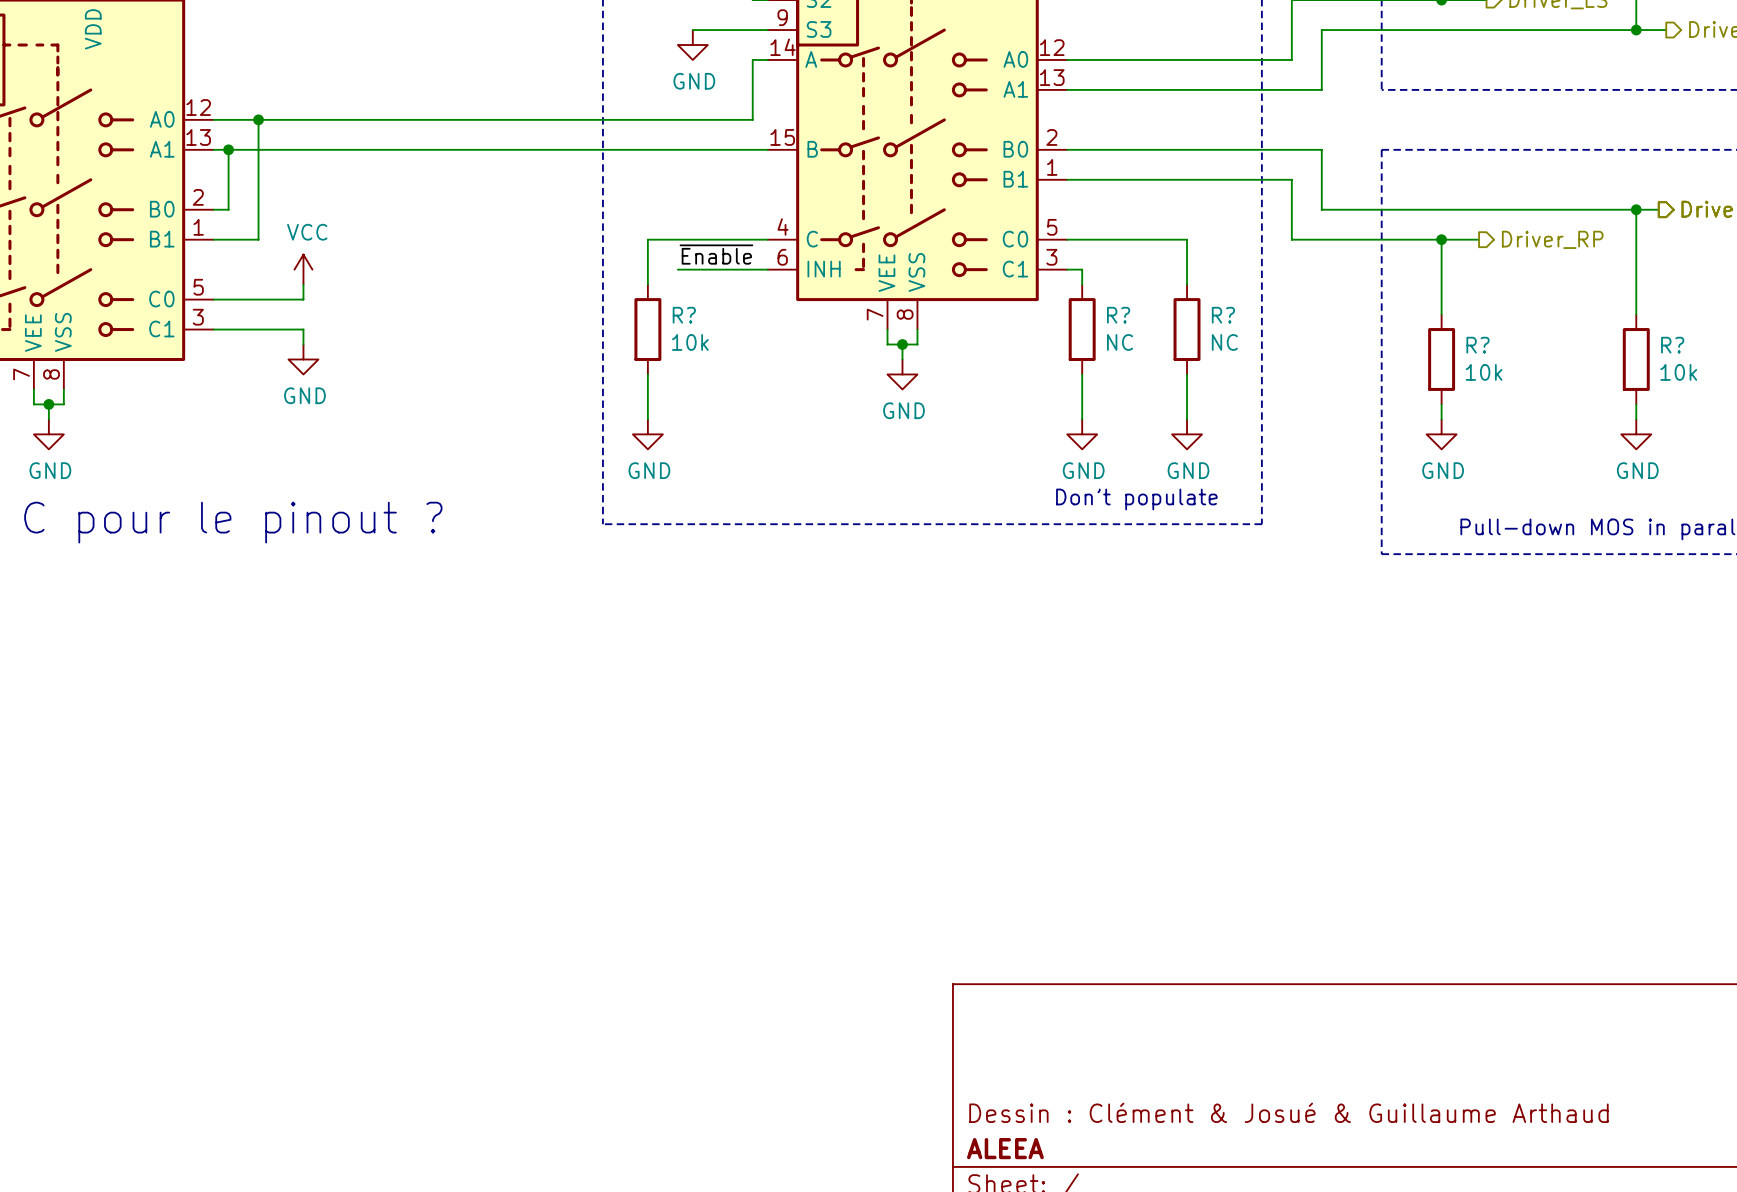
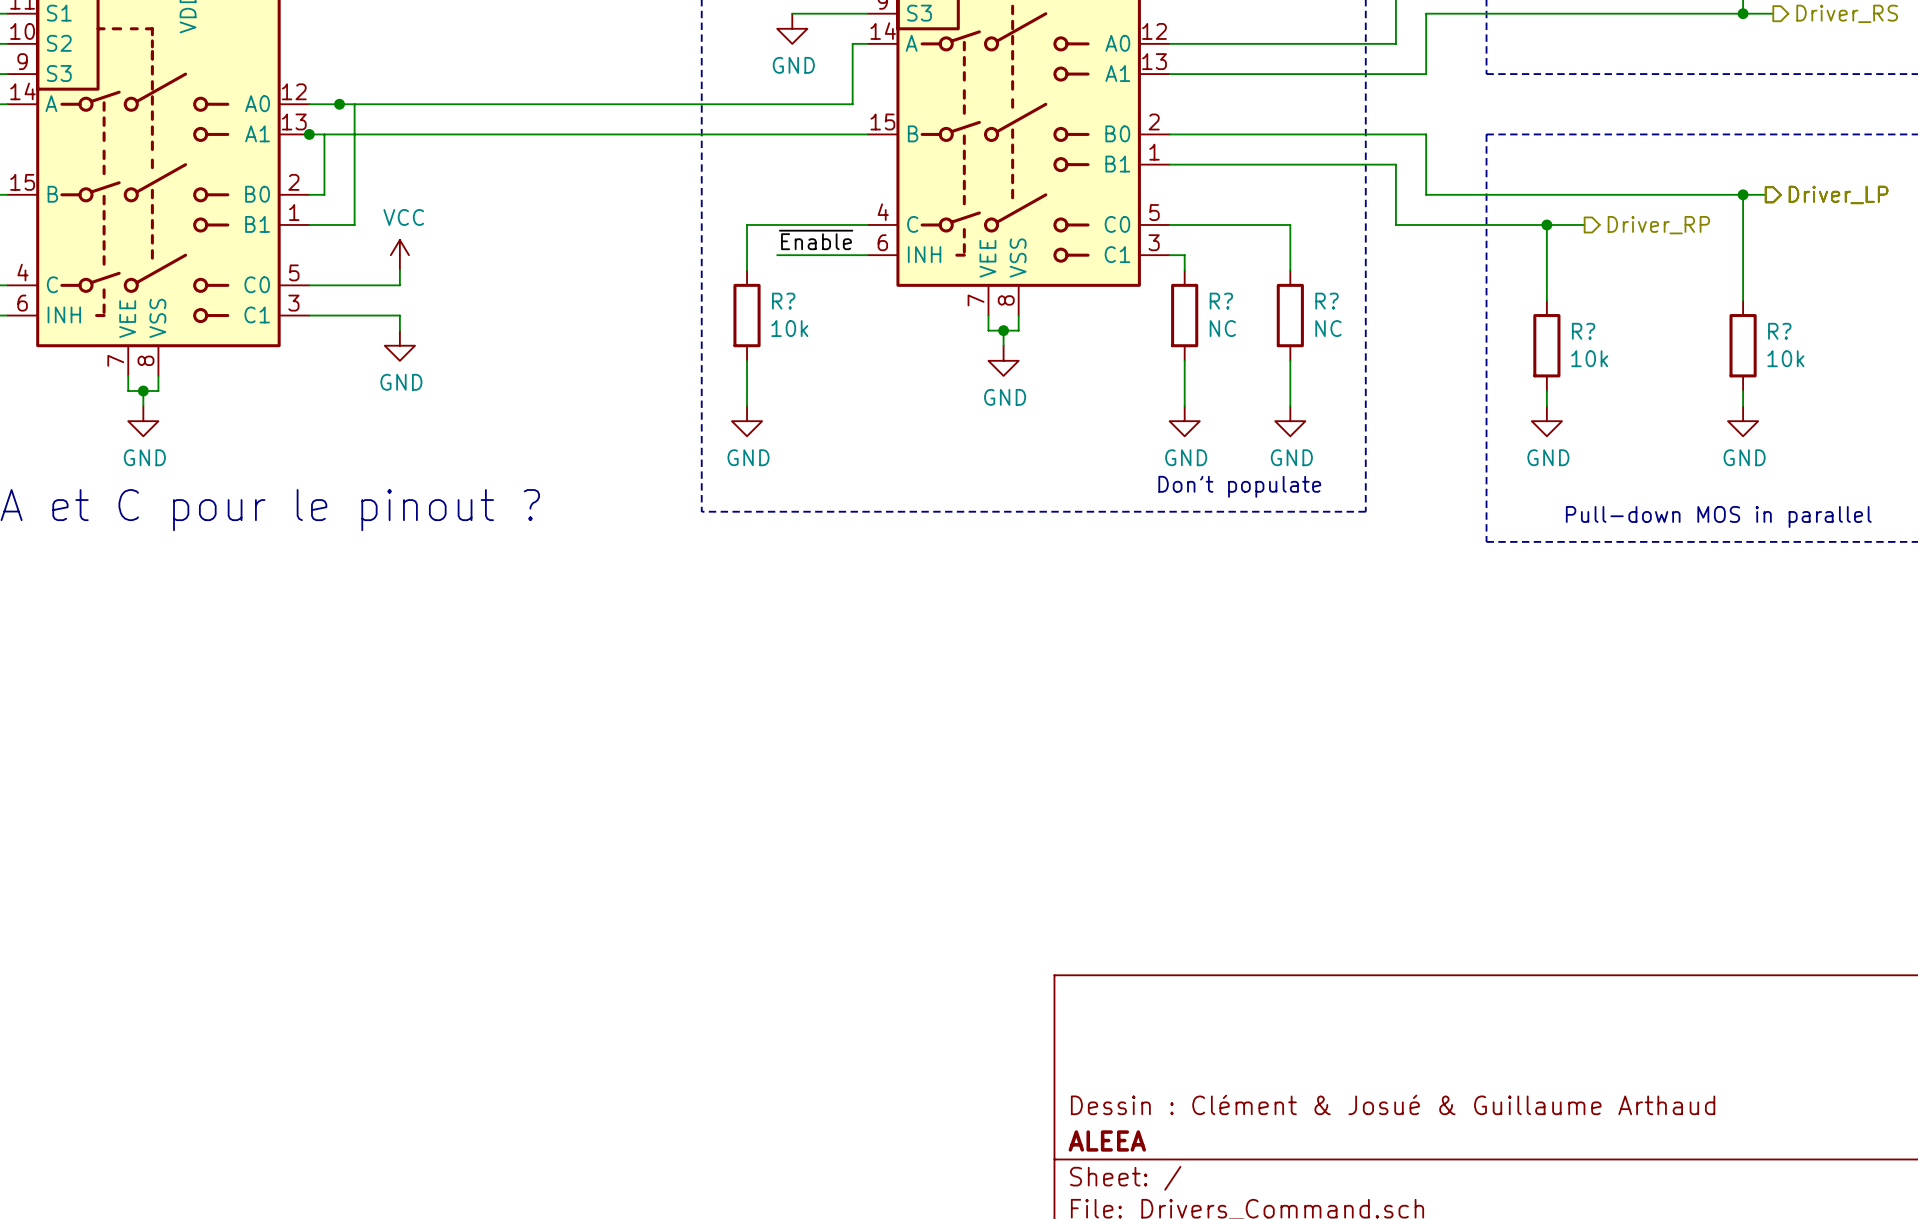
junction position: (258, 119) -> (339, 104)
junction position: (228, 149) -> (309, 134)

